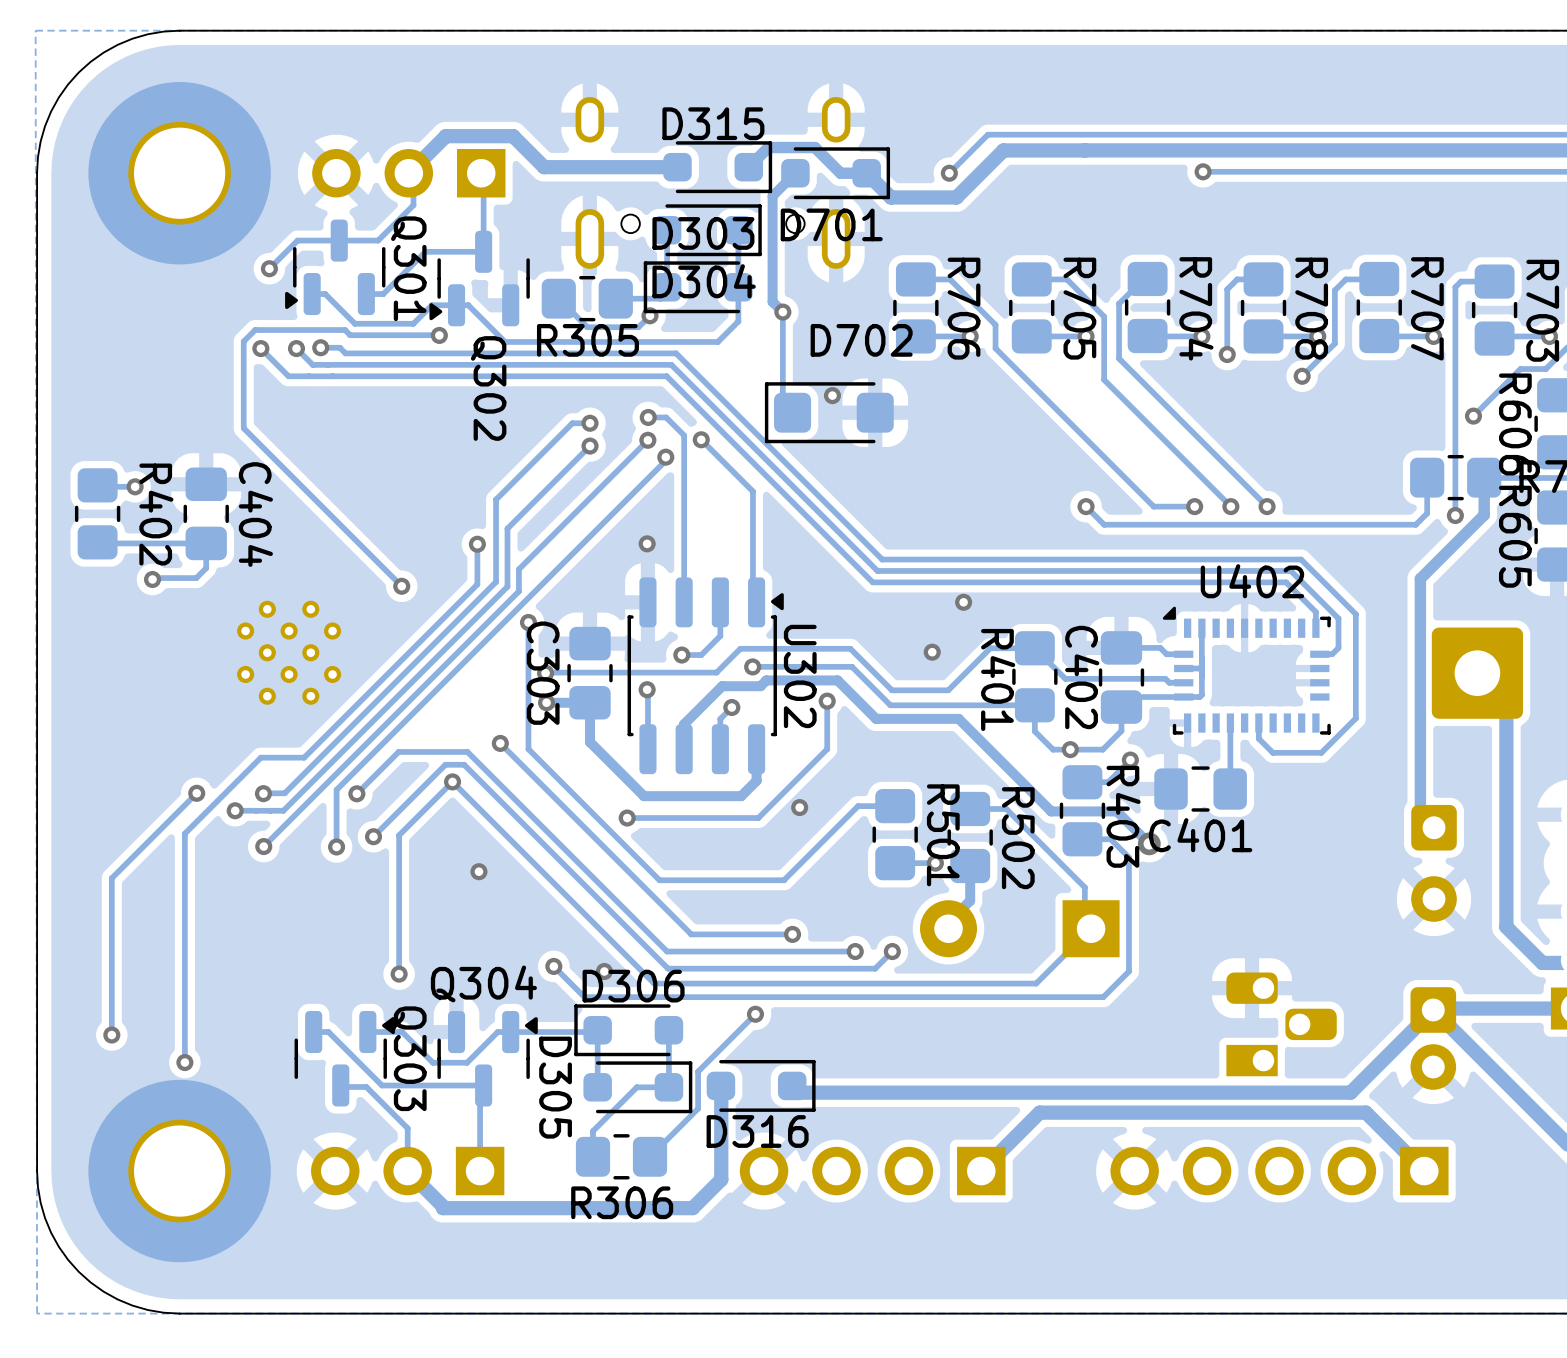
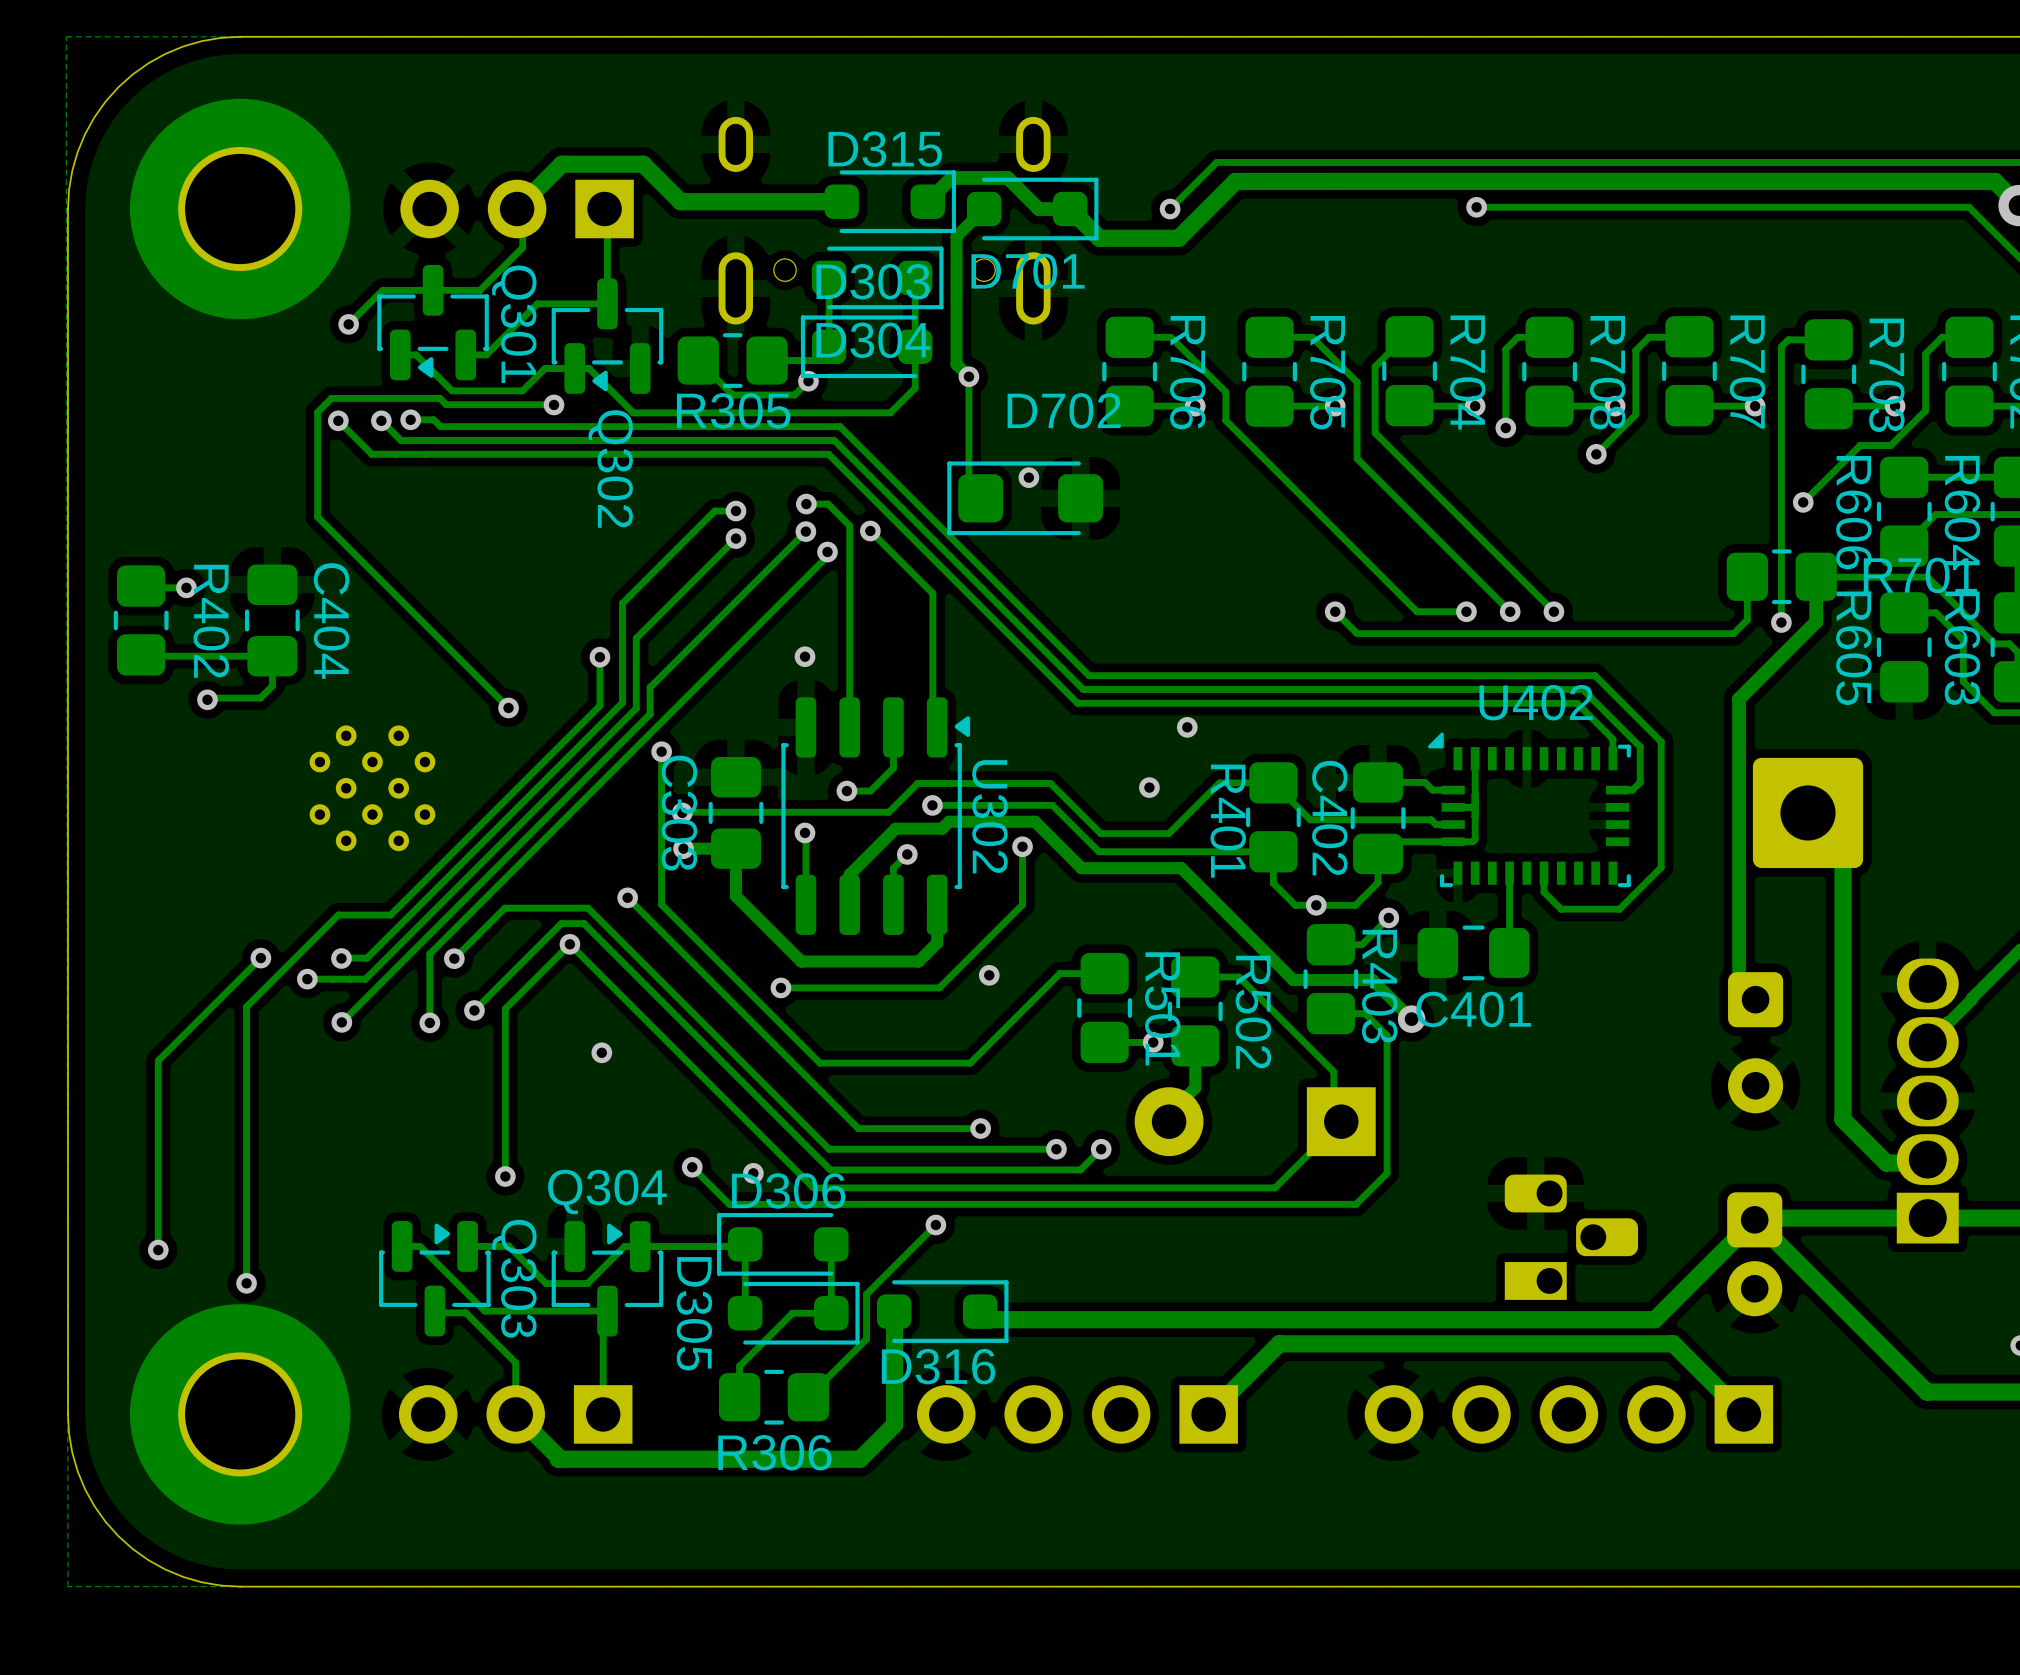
Q301 footprint: [285, 219, 386, 316] -> [377, 264, 489, 381]
Q302 footprint: [429, 230, 530, 327] -> [551, 278, 664, 394]
Q303 footprint: [294, 1010, 395, 1107] -> [379, 1221, 491, 1337]
Q304 footprint: [437, 1011, 538, 1107] -> [551, 1221, 664, 1337]

